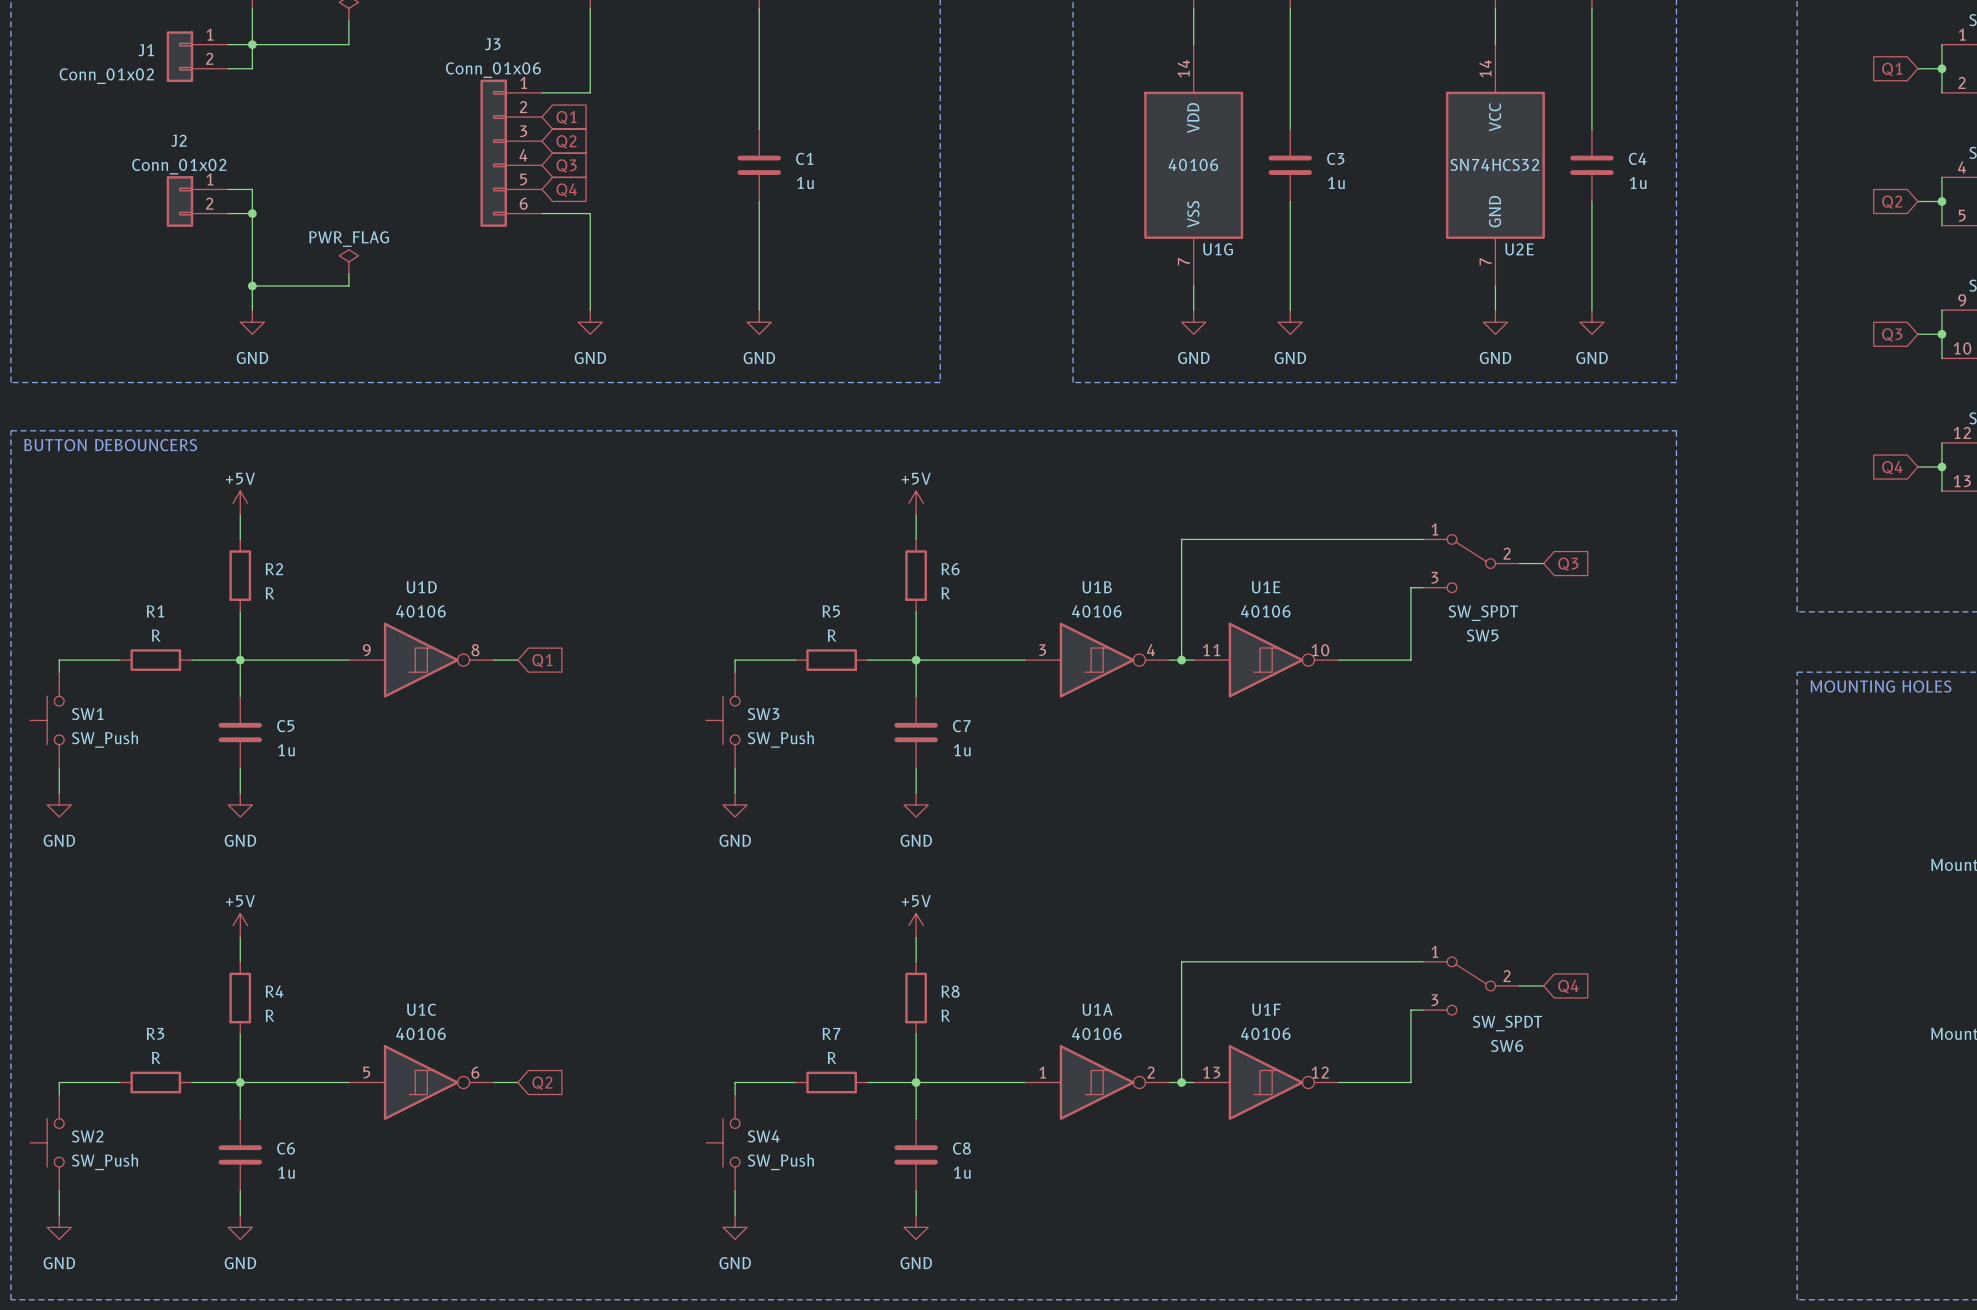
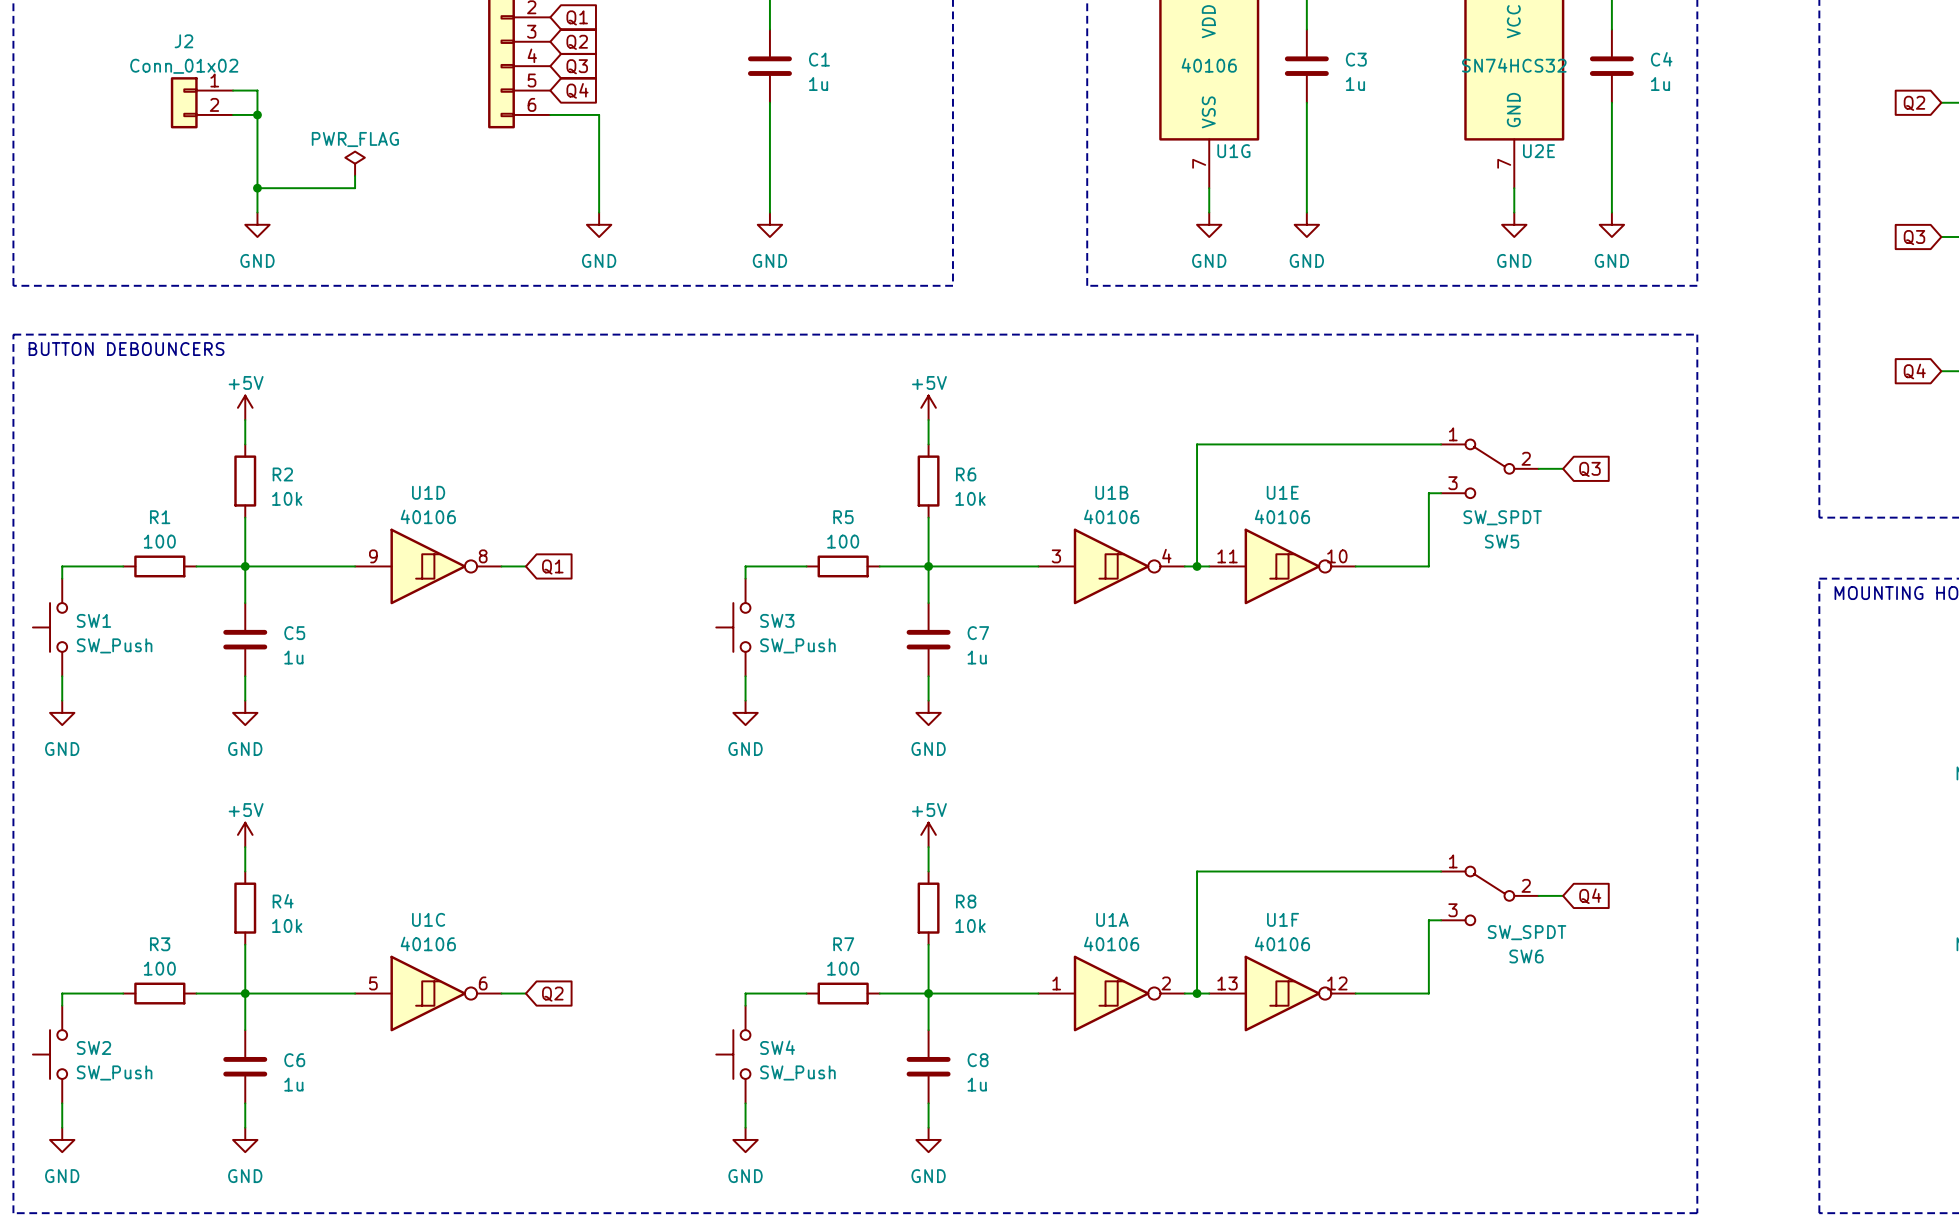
R2 value: R (269, 593) -> 10k (287, 498)
R6 value: R (945, 593) -> 10k (970, 498)
R1 value: R (156, 635) -> 100 (159, 541)
R5 value: R (831, 635) -> 100 (843, 541)
R4 value: R (269, 1015) -> 10k (287, 925)
R8 value: R (945, 1015) -> 10k (970, 925)
R3 value: R (156, 1057) -> 100 (159, 968)
R7 value: R (831, 1057) -> 100 (843, 968)

